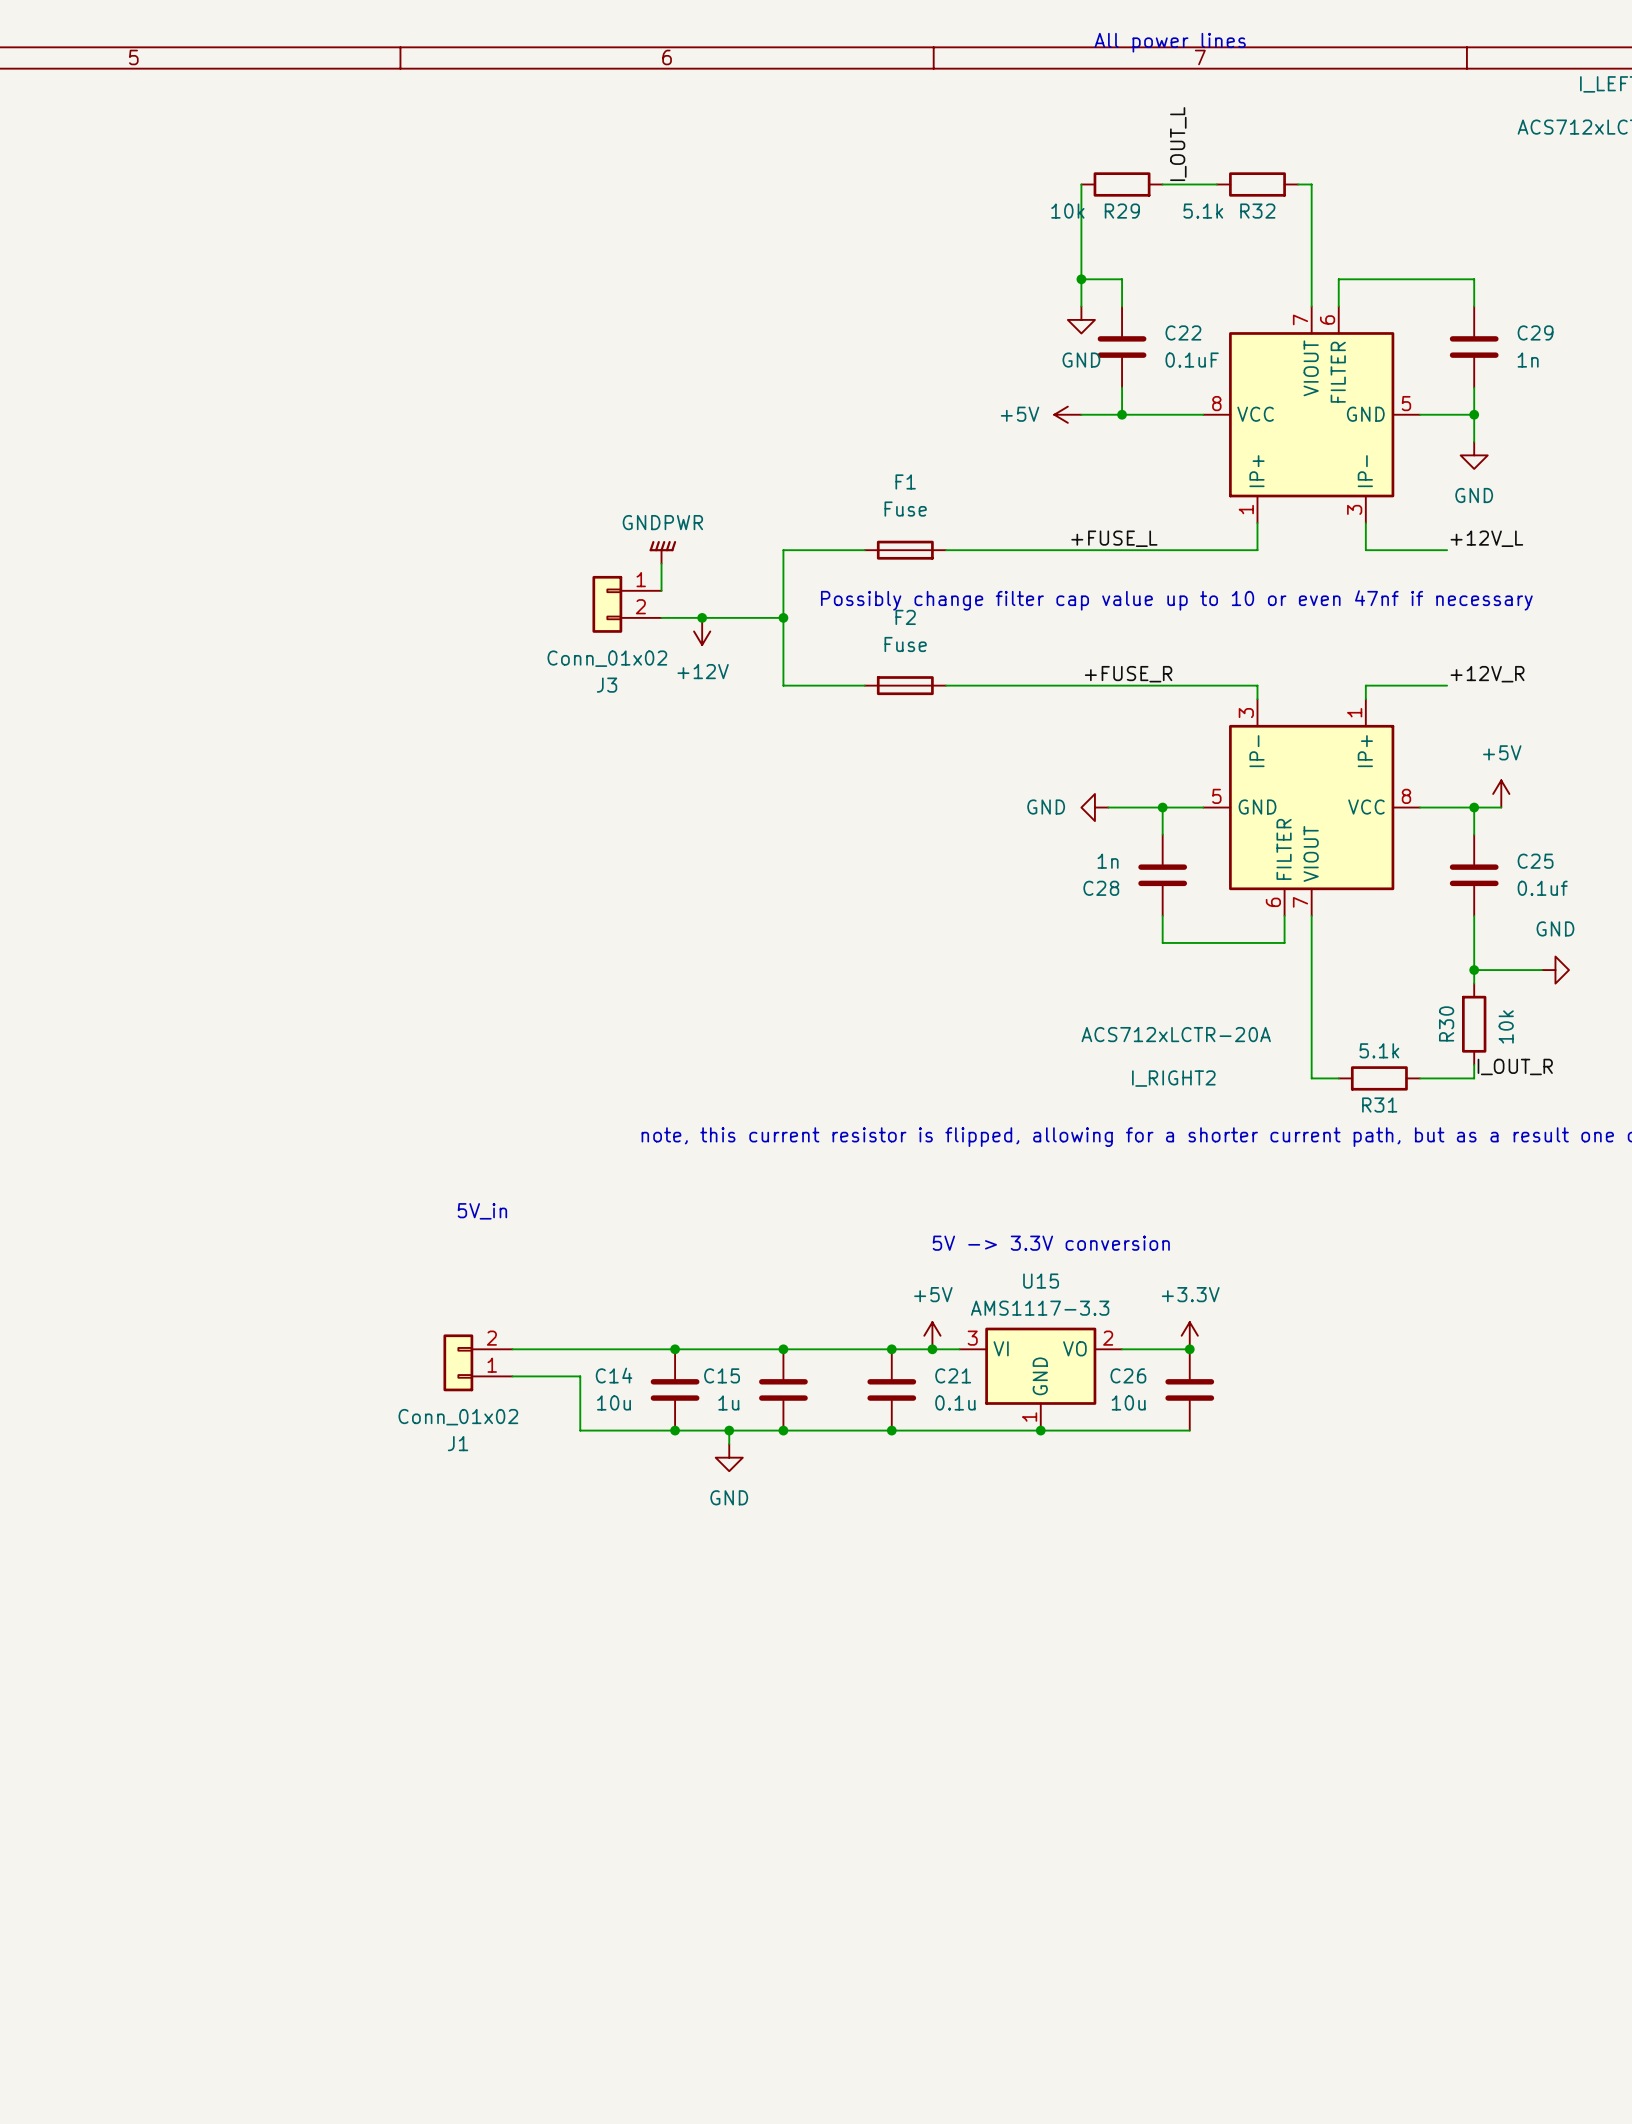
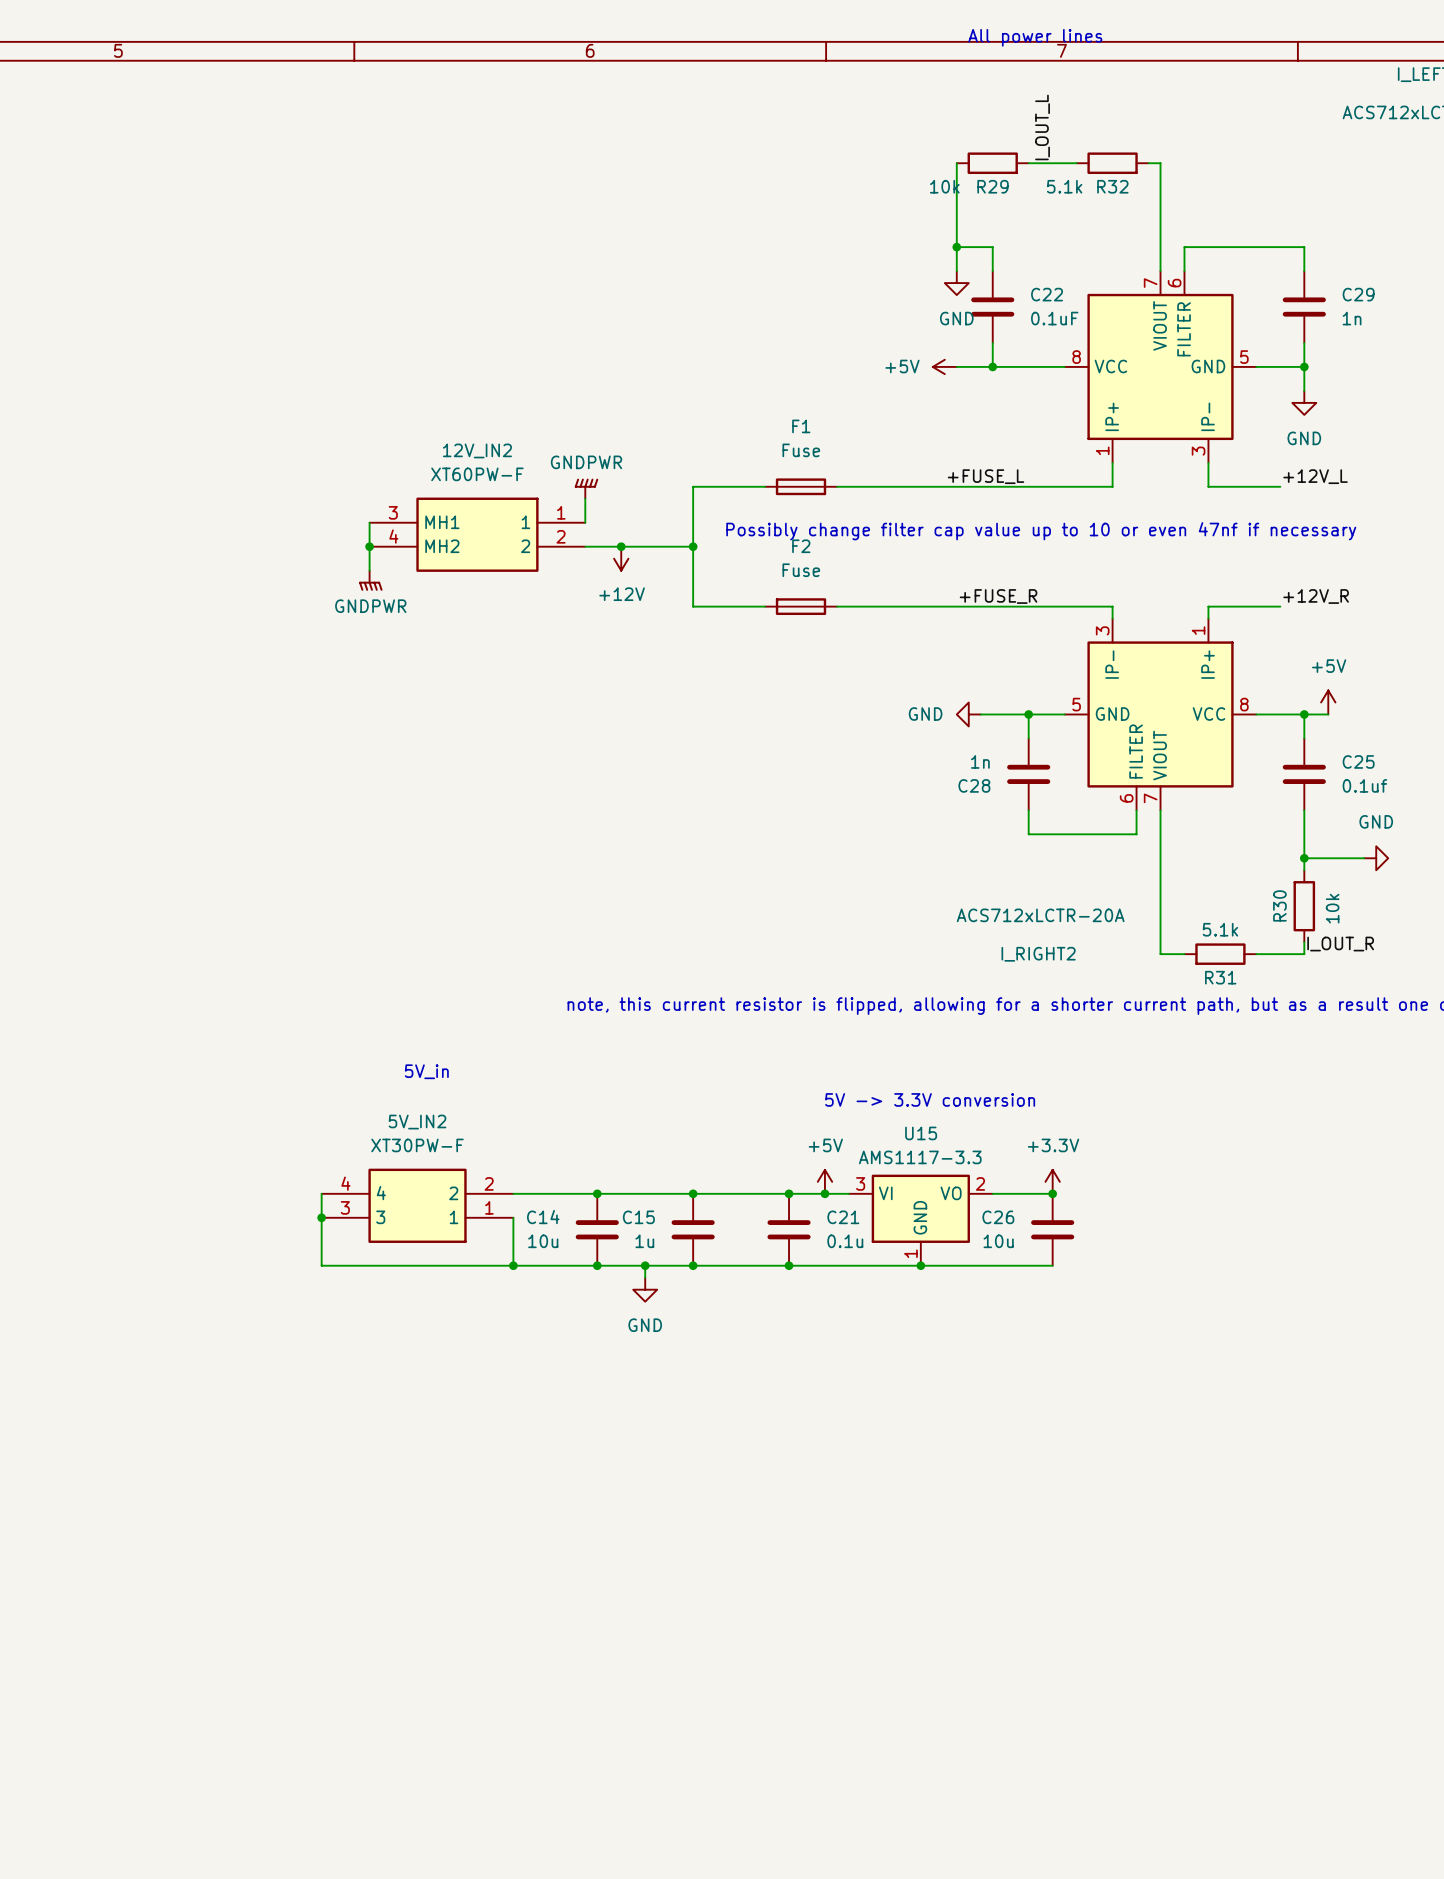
wire: none -> (369, 522) (369, 570)
12V_IN2: none -> XT60PW-F (477, 534)
J3: Conn_01x02 (626, 604) -> none
junction: none -> (369, 546)
power symbol: none -> GNDPWR (370, 580)
wire: none -> (321, 1193) (321, 1265) (513, 1265)
5V_IN2: none -> XT30PW-F (417, 1205)
J1: Conn_01x02 (478, 1362) -> none
junction: none -> (321, 1217)
junction: none -> (513, 1265)

